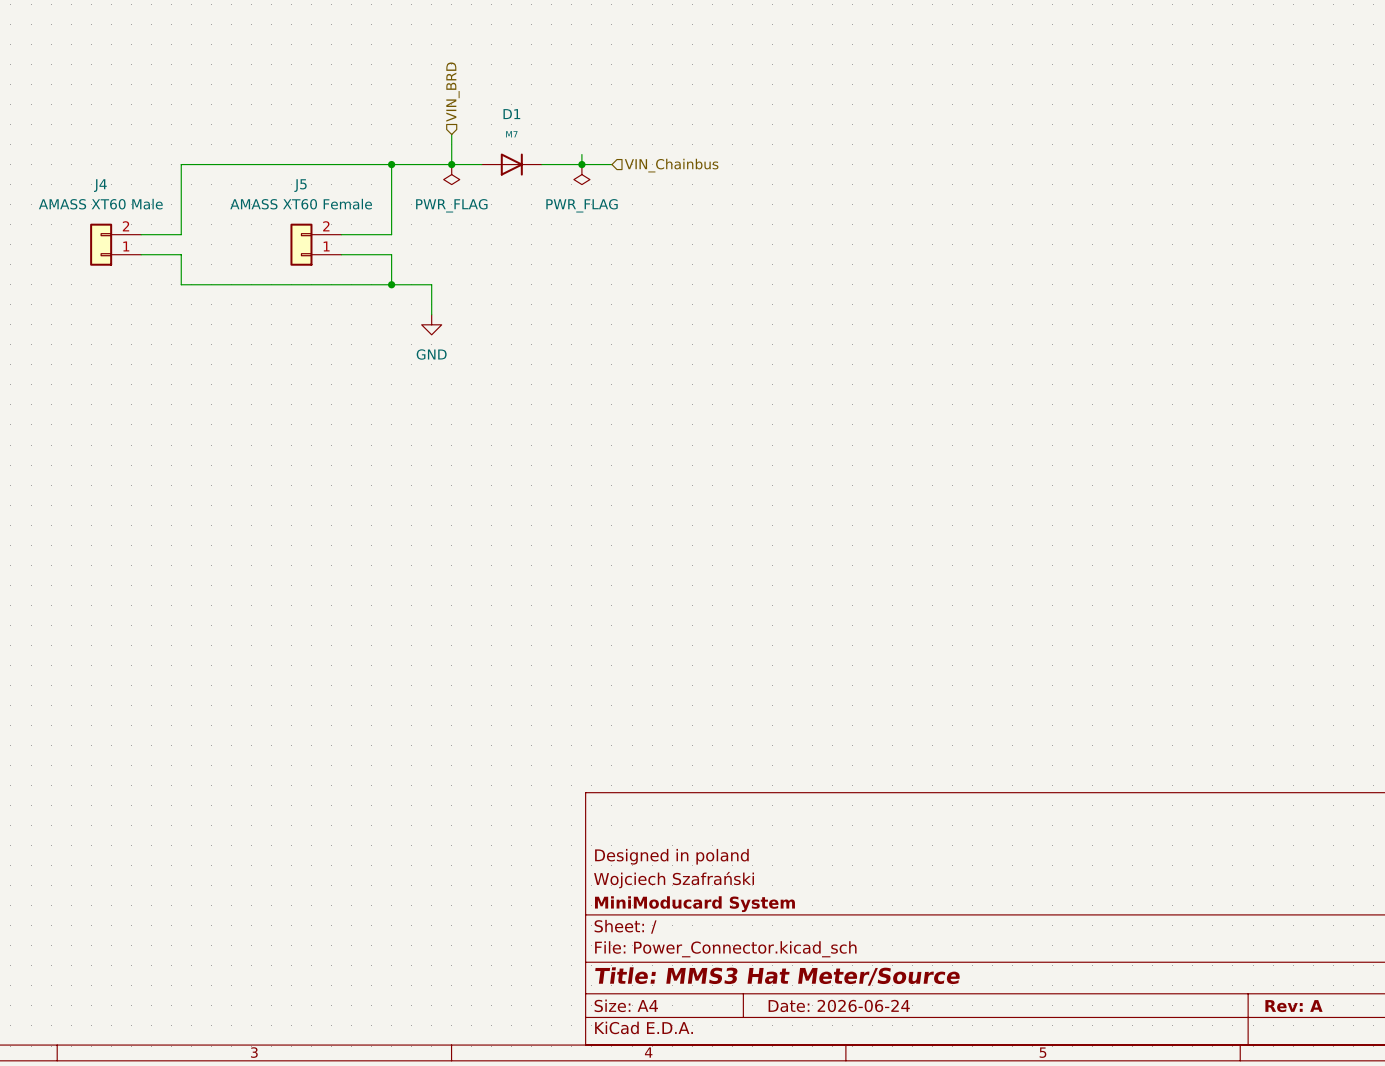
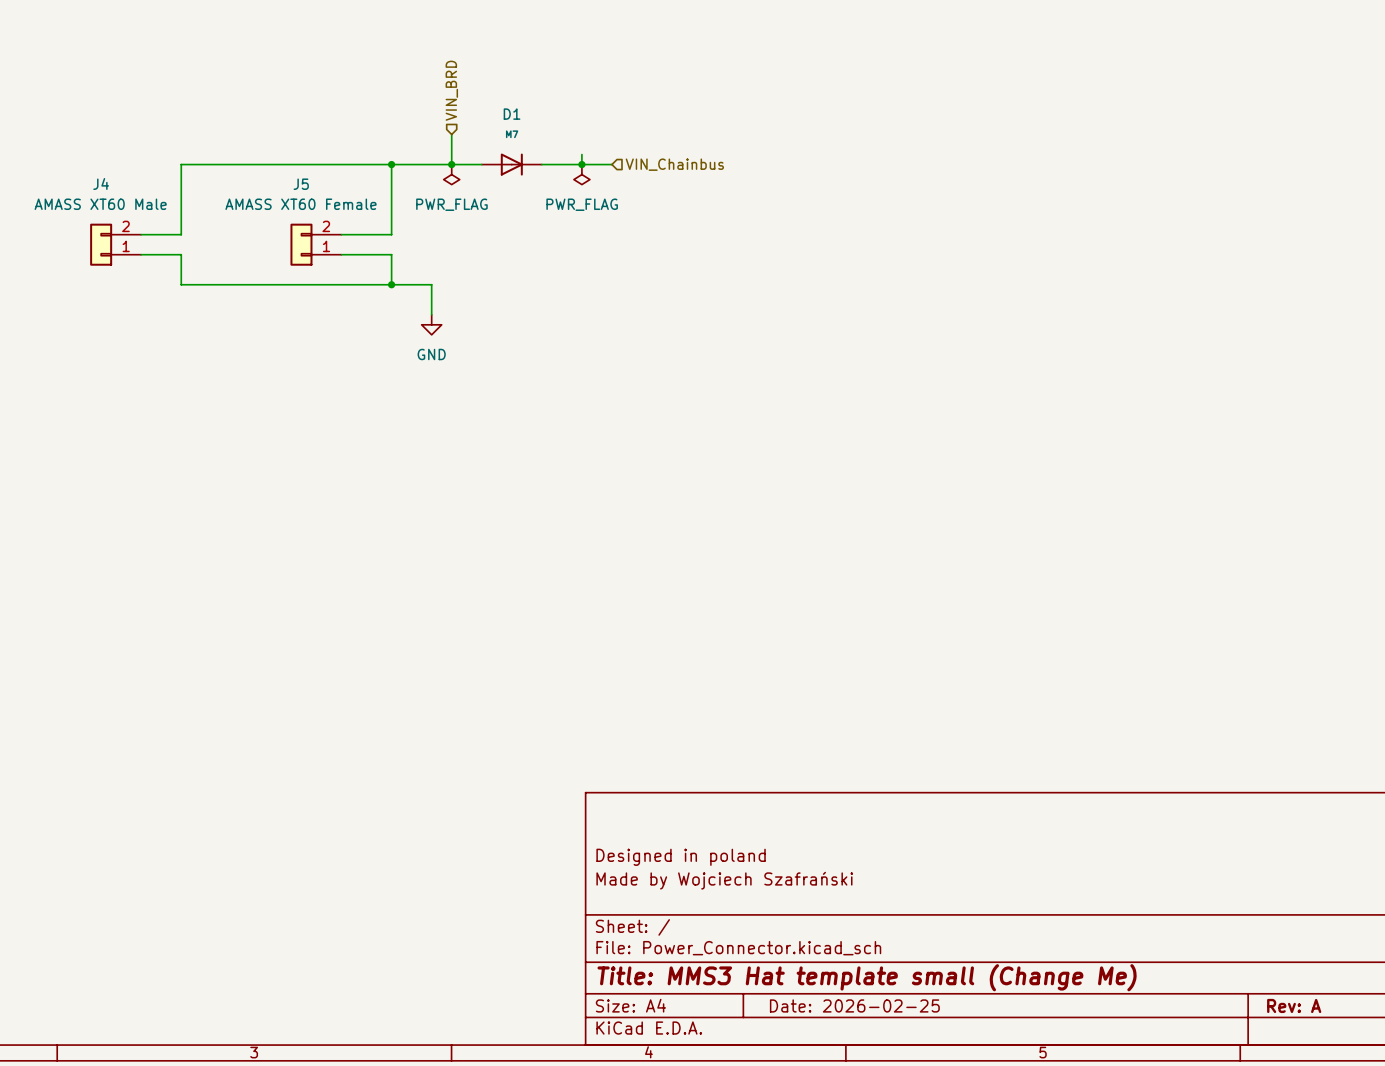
title block: Wojciech Szafrański (674, 880) -> Made by Wojciech Szafrański (724, 880)
title block: MiniModucard System (694, 904) -> none
title block: Title: MMS3 Hat Meter/Source (777, 976) -> Title: MMS3 Hat template small (Change Me) (867, 977)
title block: Date: 2026-06-24 (839, 1005) -> Date: 2026-02-25 (854, 1005)

